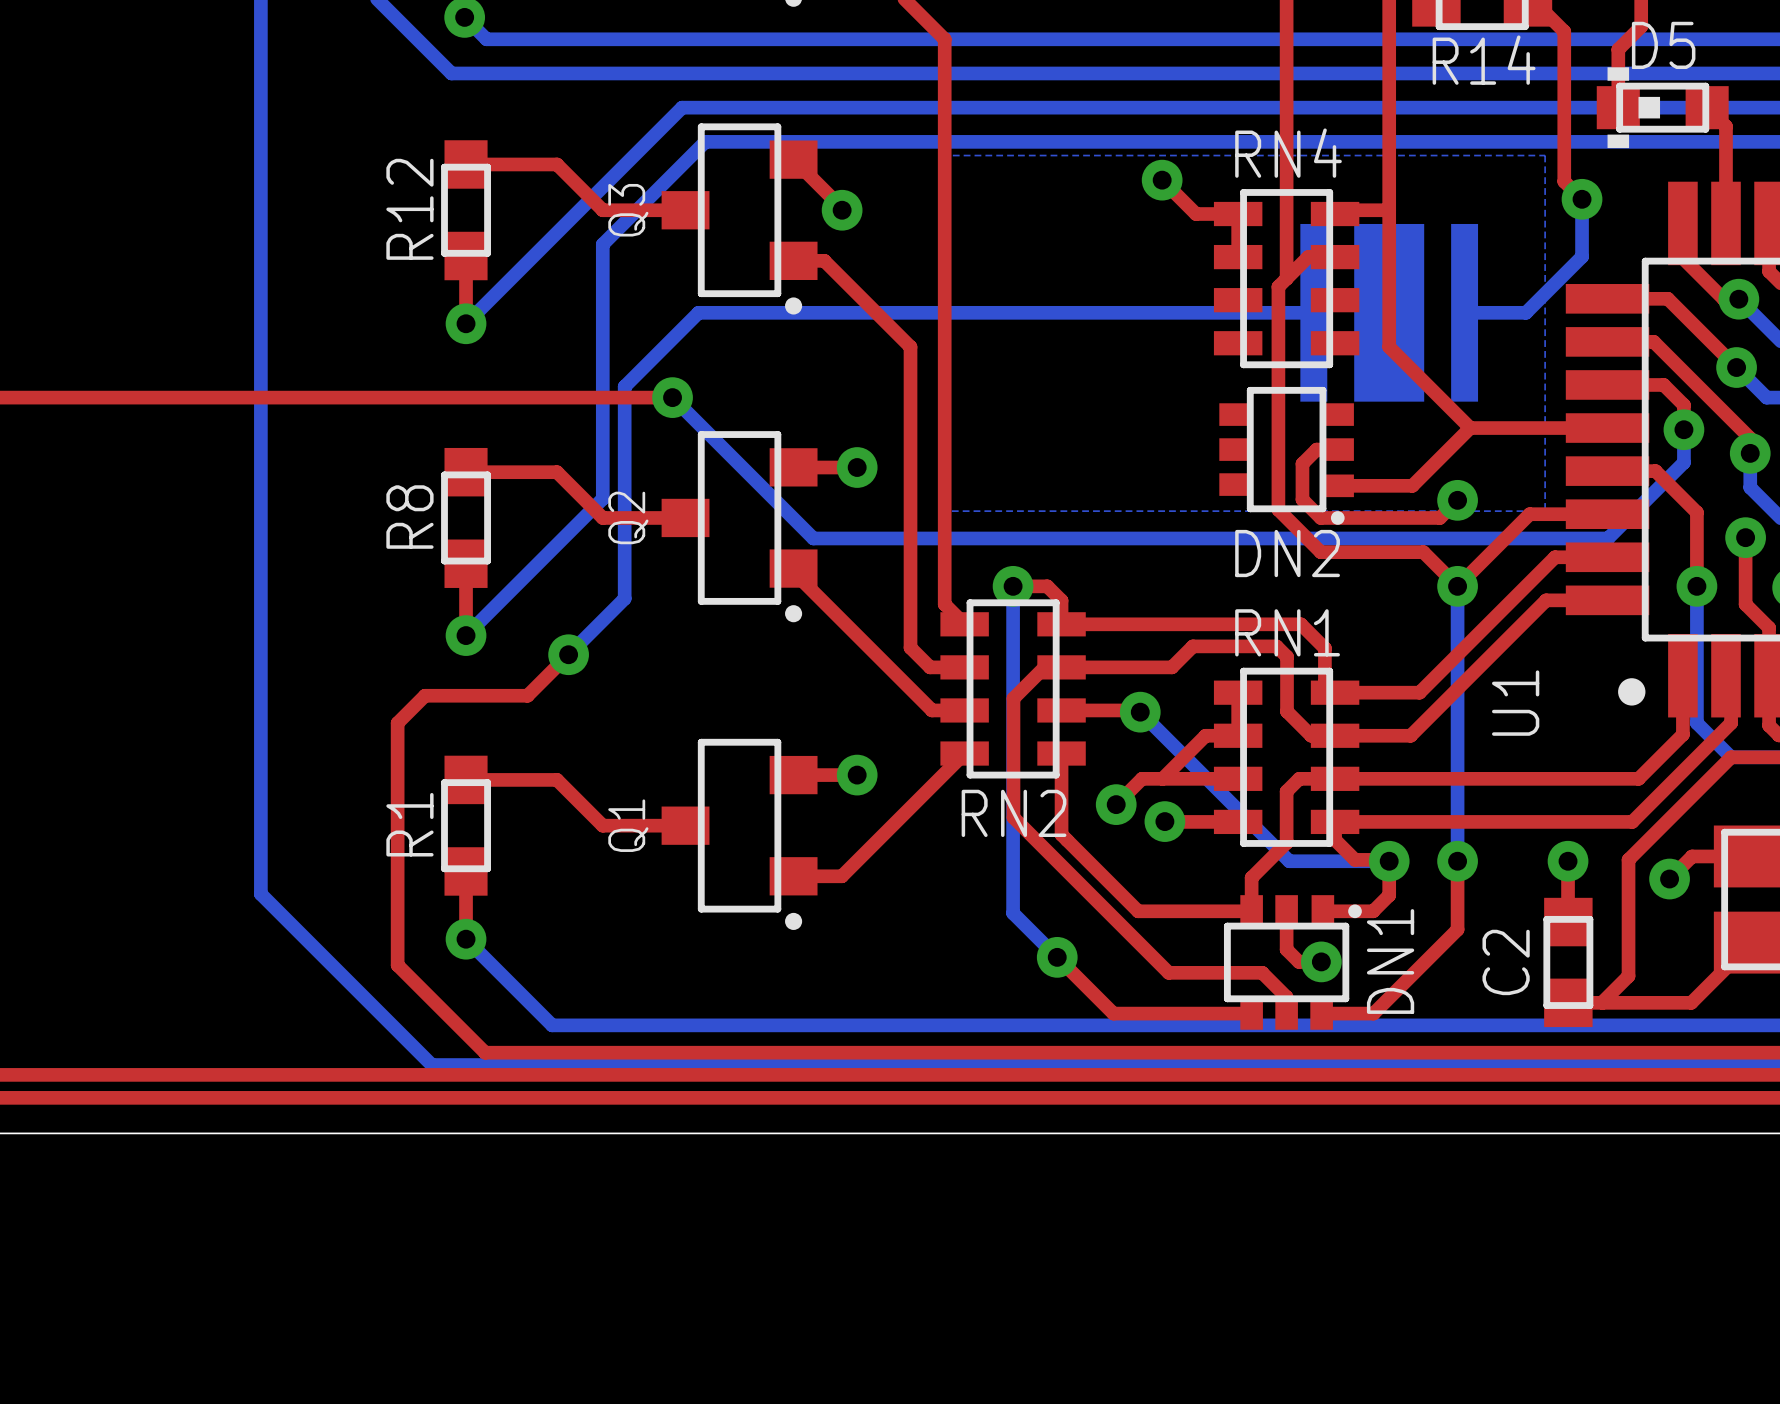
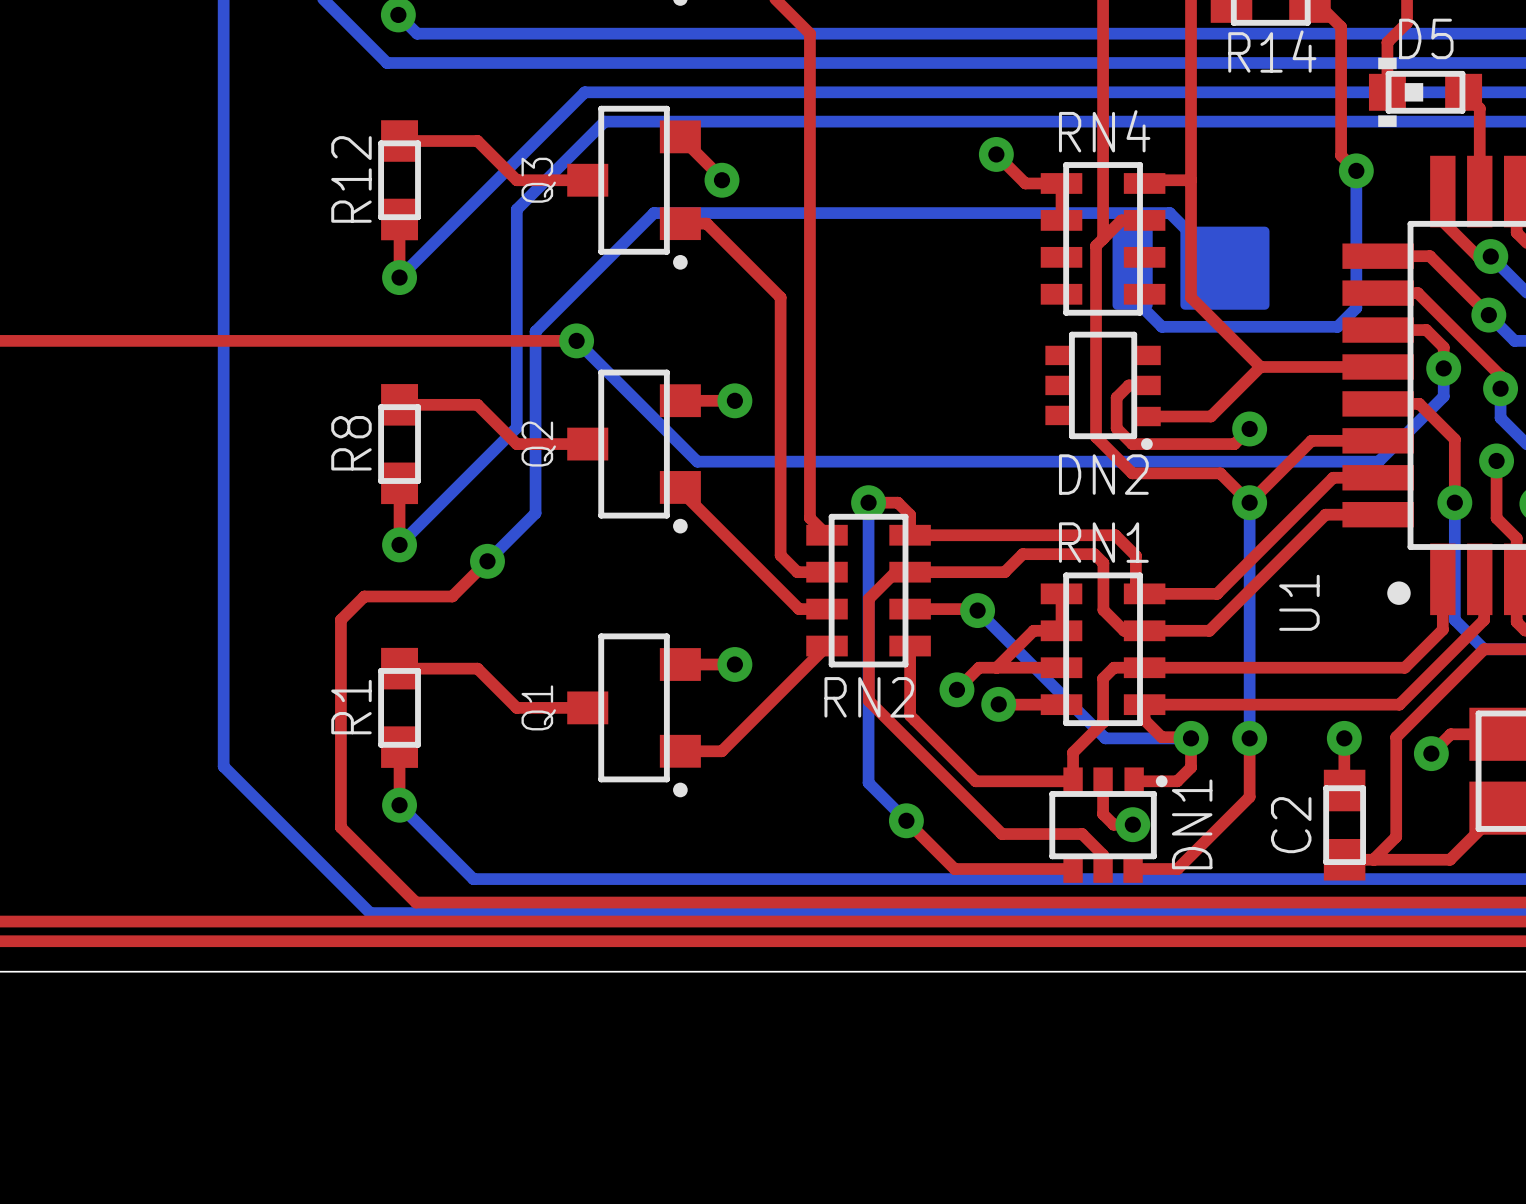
bottom zone outline: (941, 155) (941, 511) (1545, 511) (1545, 155) (941, 155) -> none
part footprint: [1300, 223, 1479, 402] -> [1112, 226, 1270, 310]
bottom track: (1582, 256) (1525, 312) (1464, 312) -> (1356, 220) (1356, 308) (1337, 326) (1161, 326) (1132, 297) (1132, 268)
bottom track: (698, 312) (1313, 312) -> (598, 268) (653, 213) (1169, 213) (1224, 268)

